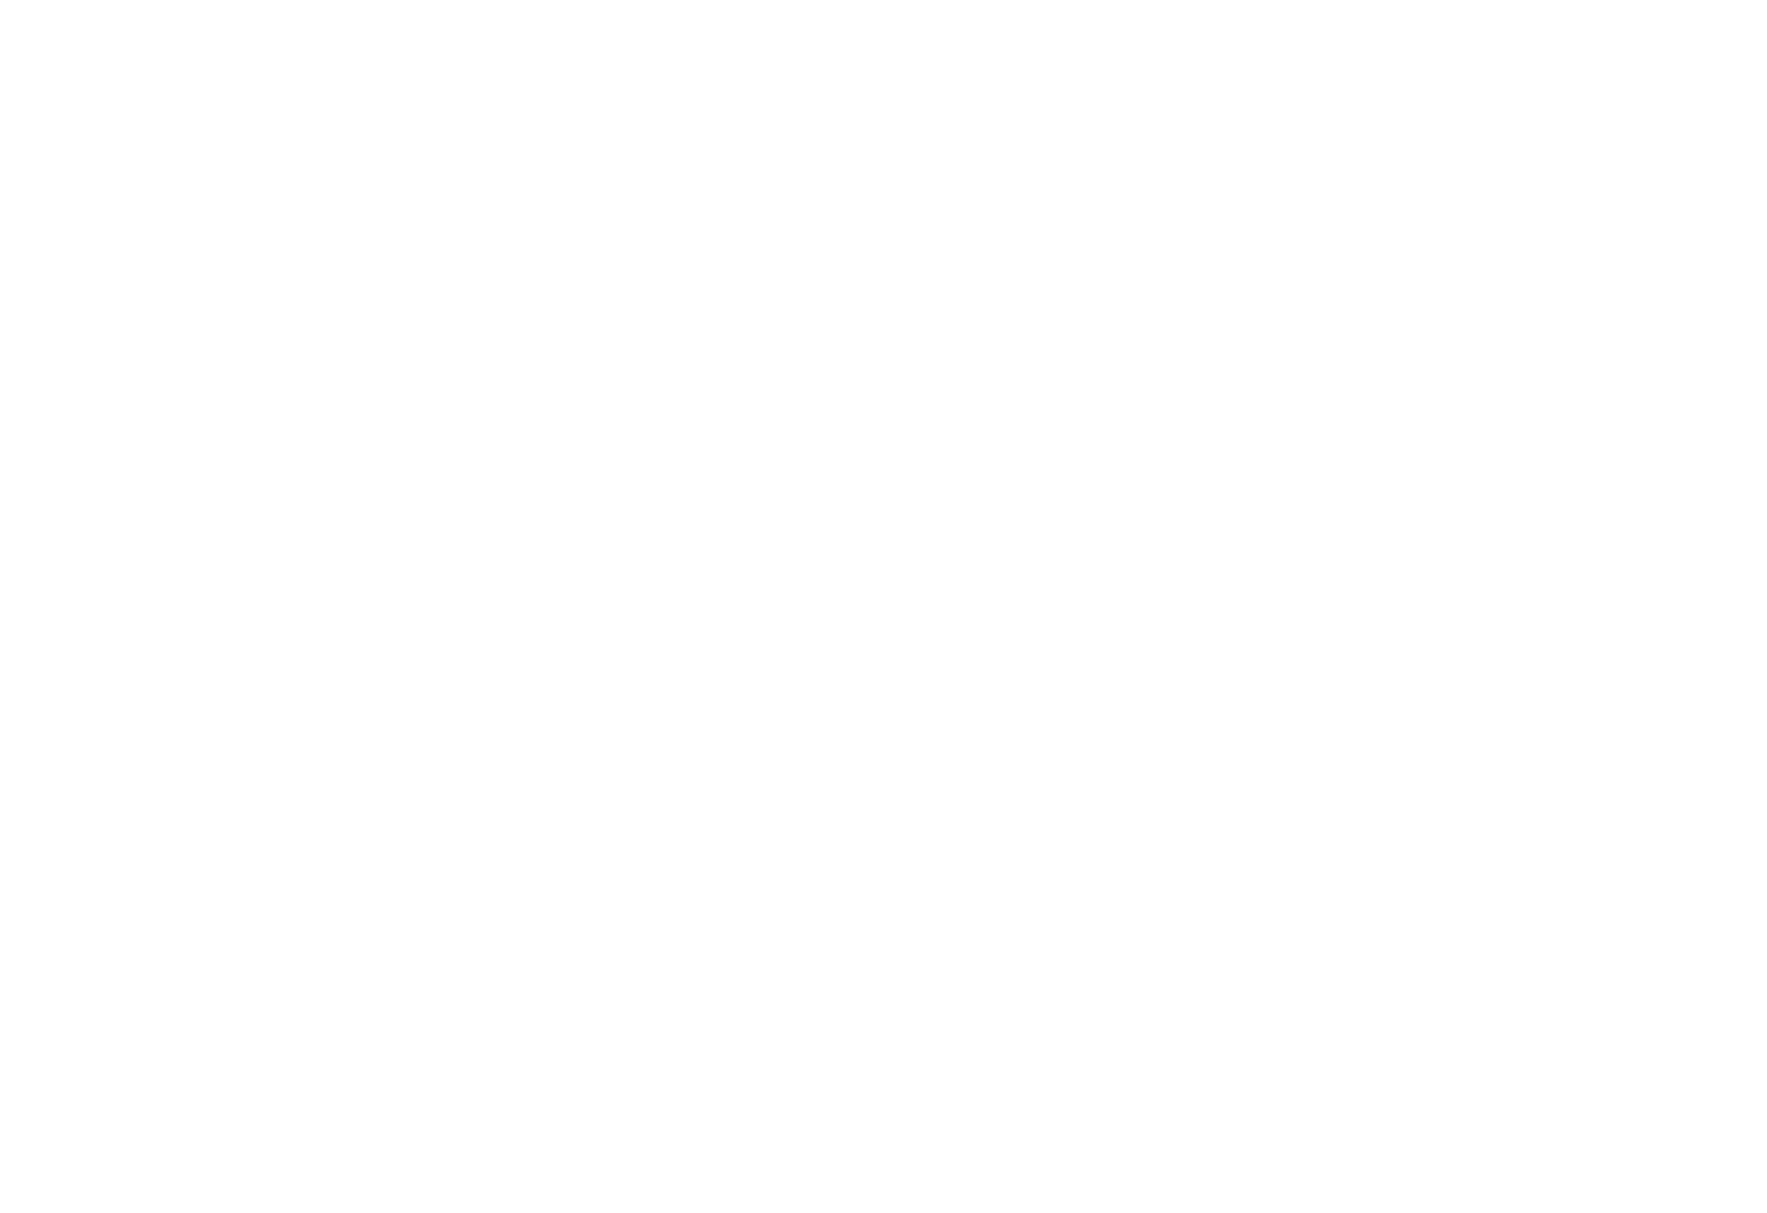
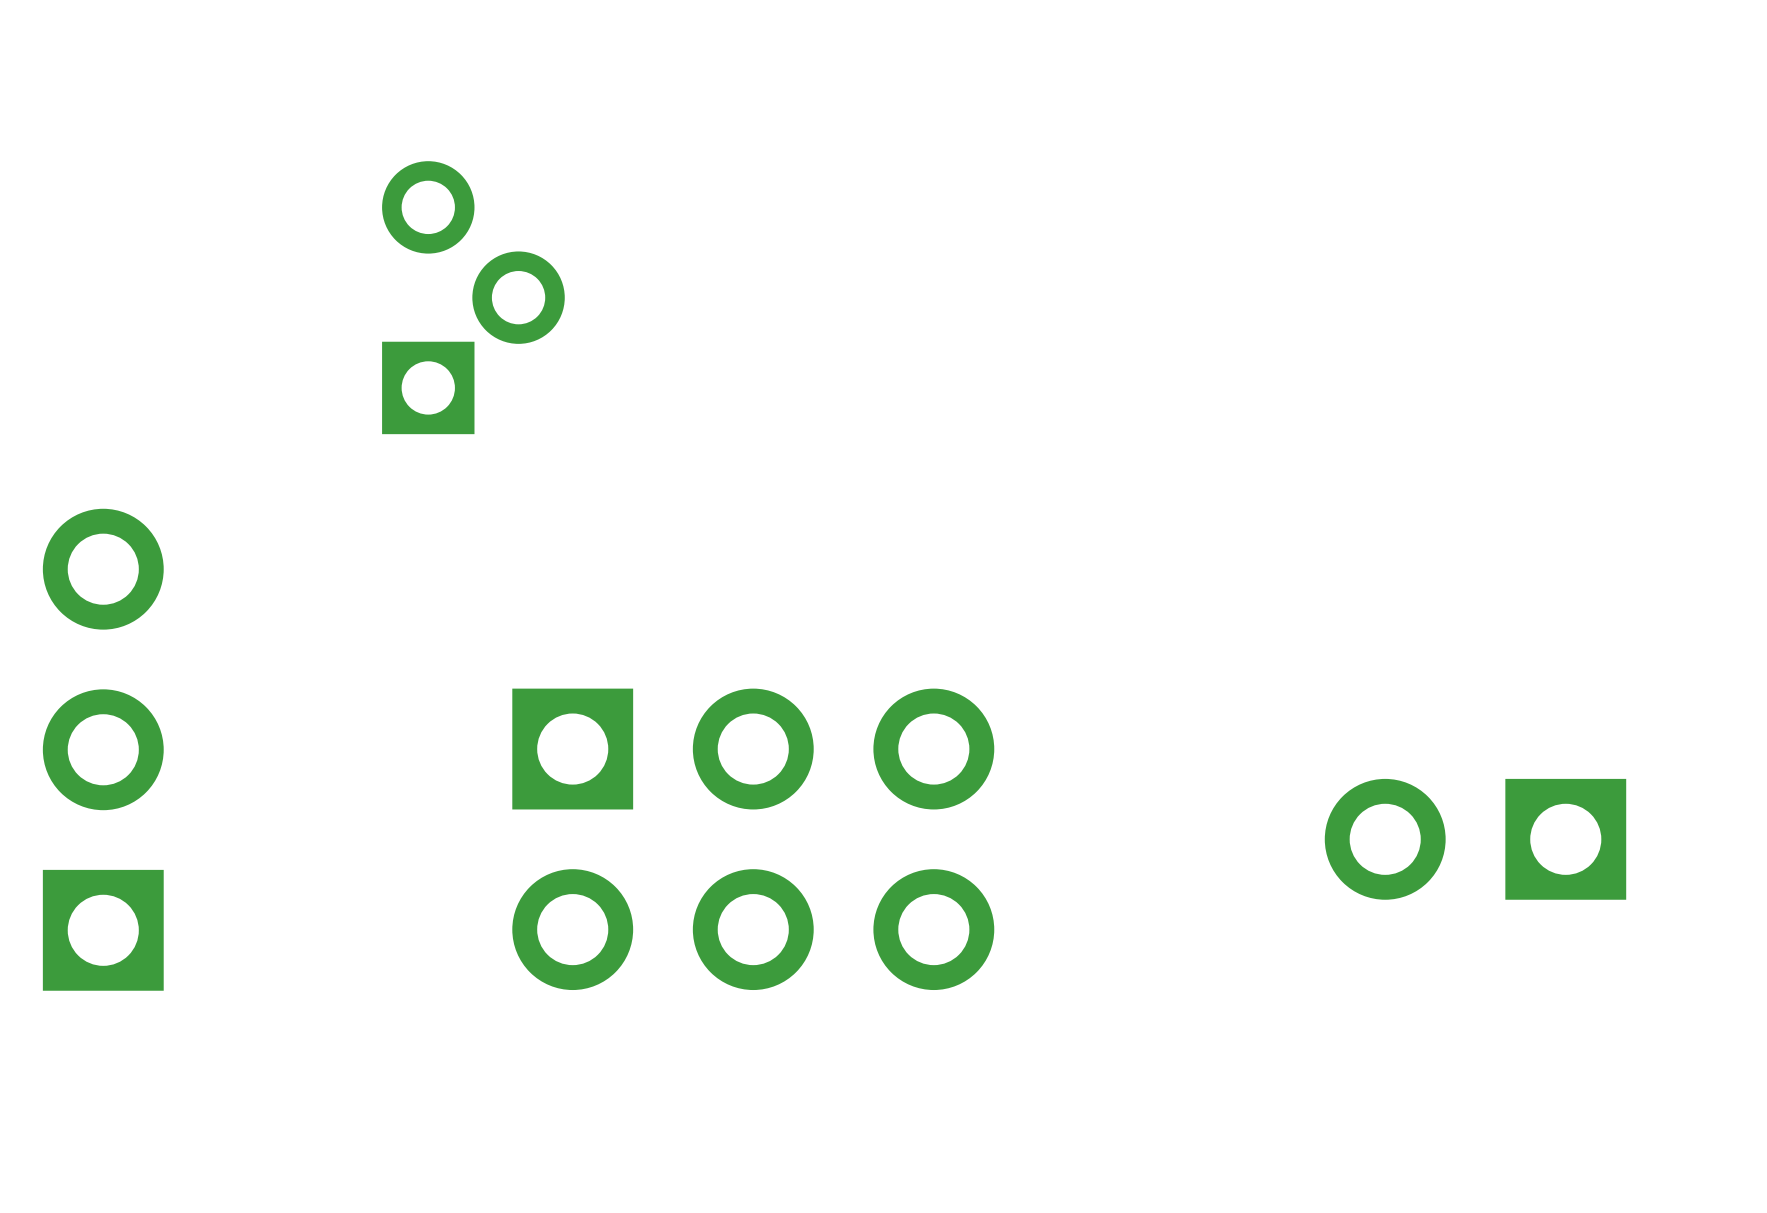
part: none -> (473, 297)
part: none -> (103, 749)
part: none -> (753, 839)
part: none -> (1475, 839)

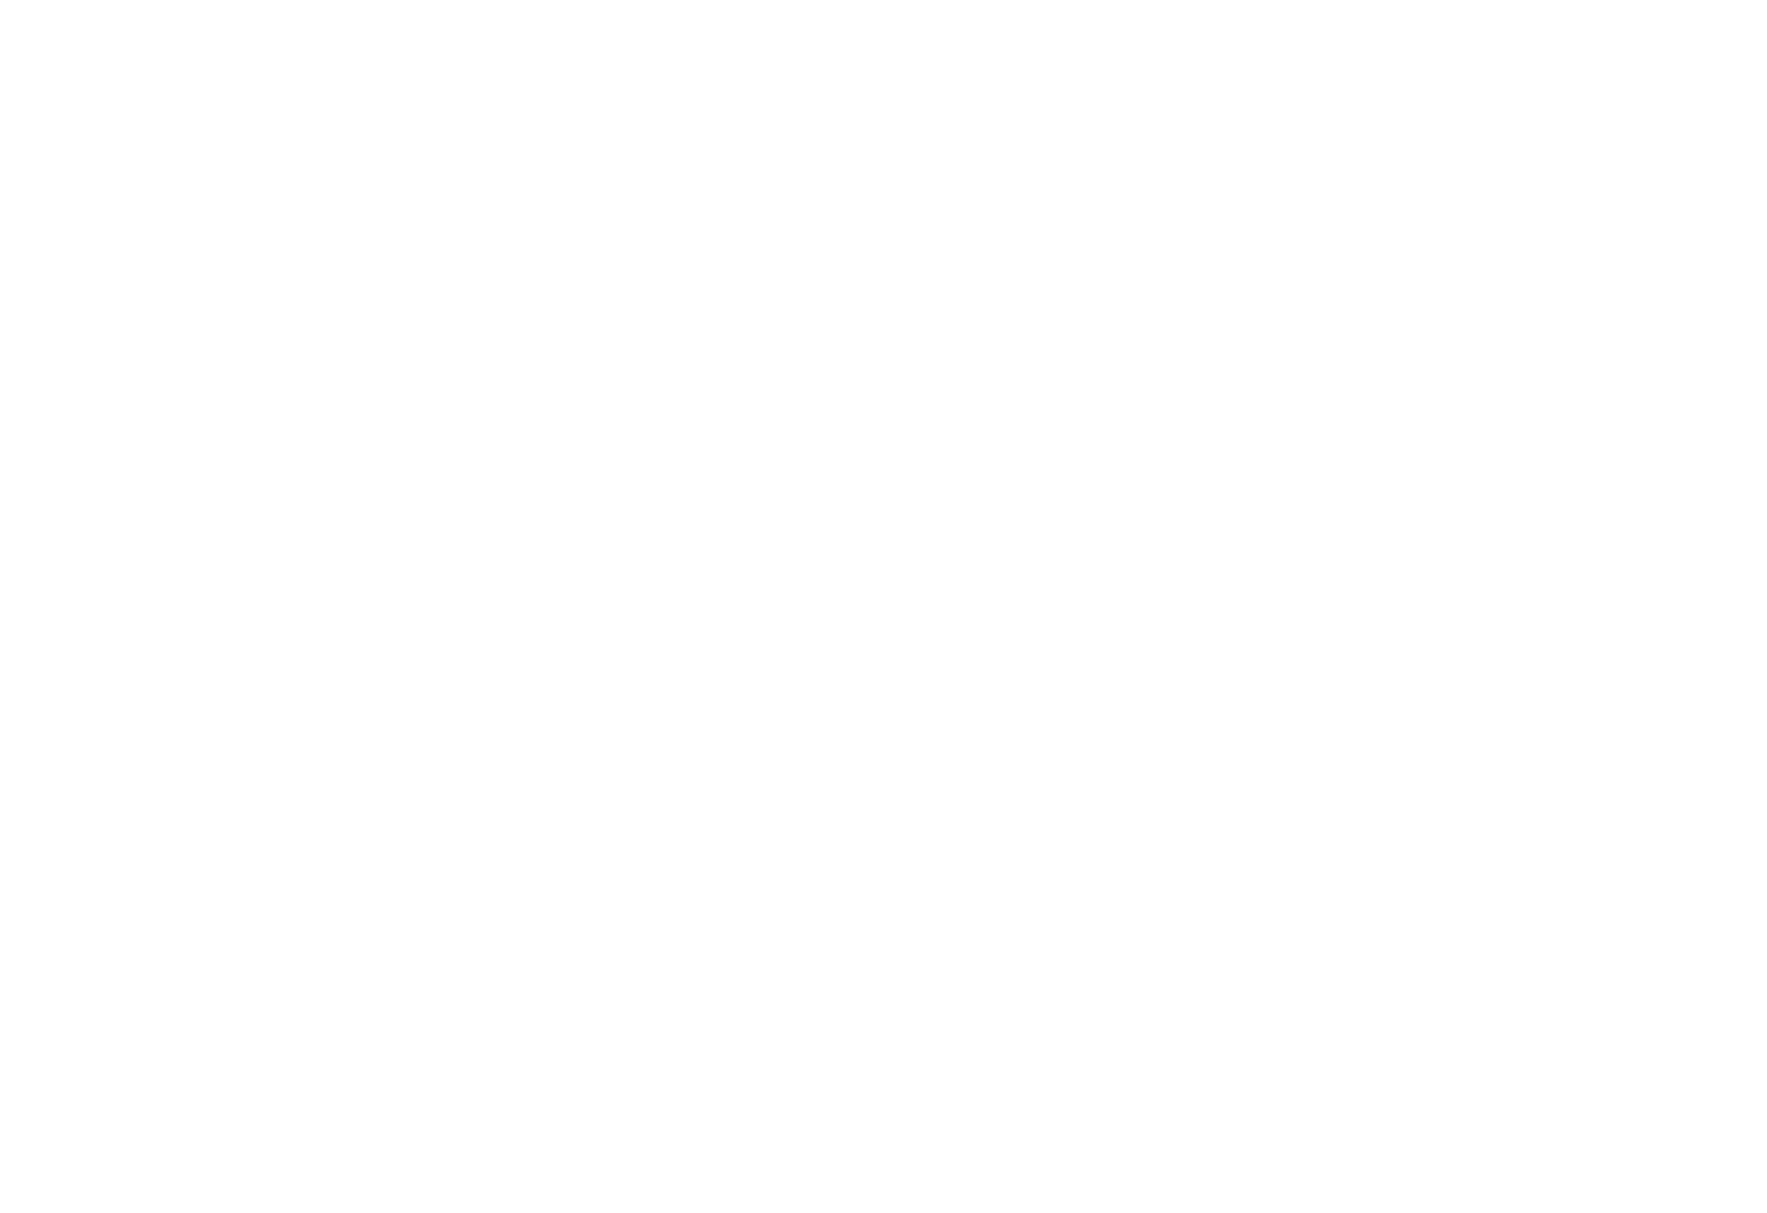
part: (473, 297) -> none
part: (103, 749) -> none
part: (753, 839) -> none
part: (1475, 839) -> none

